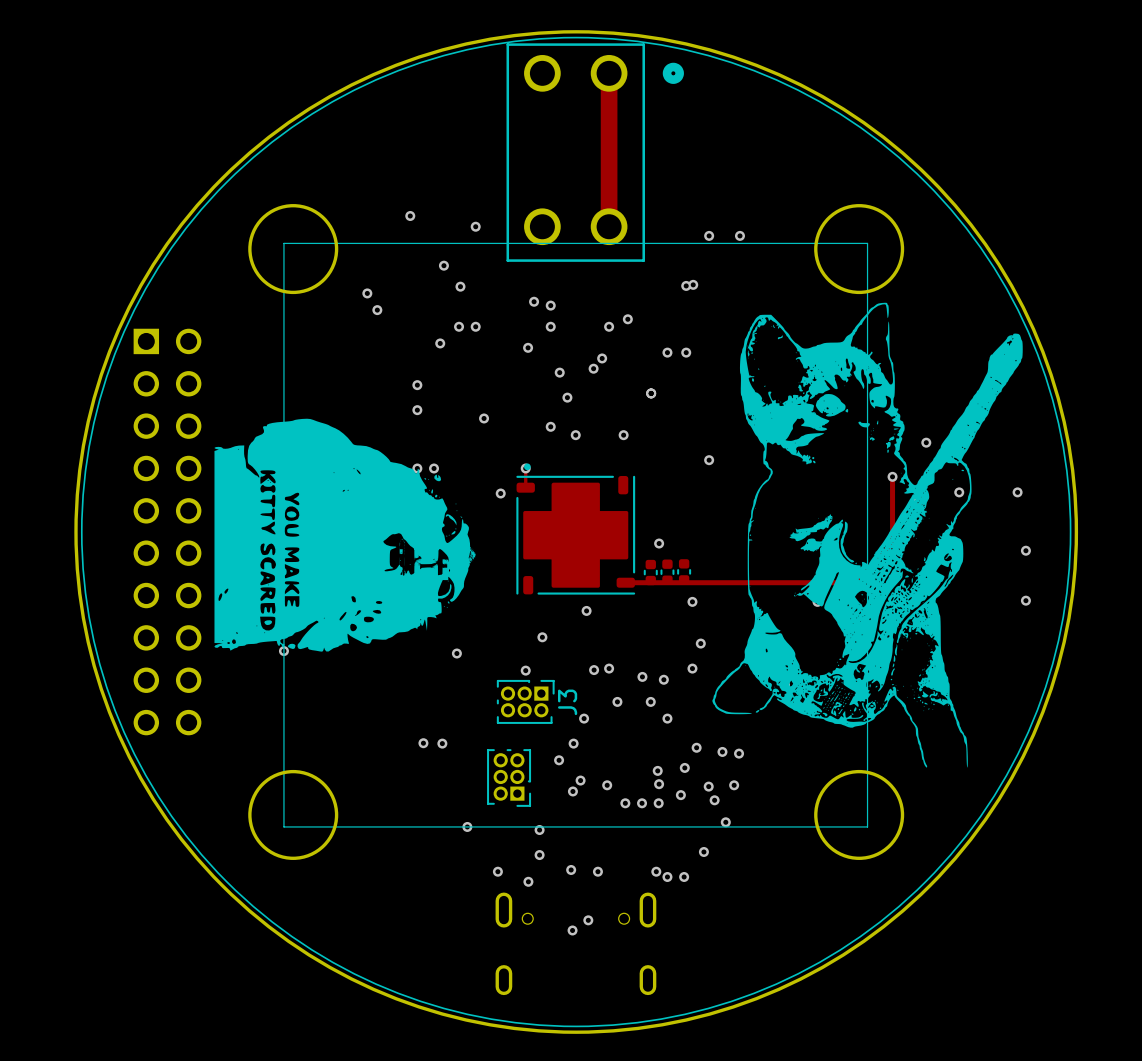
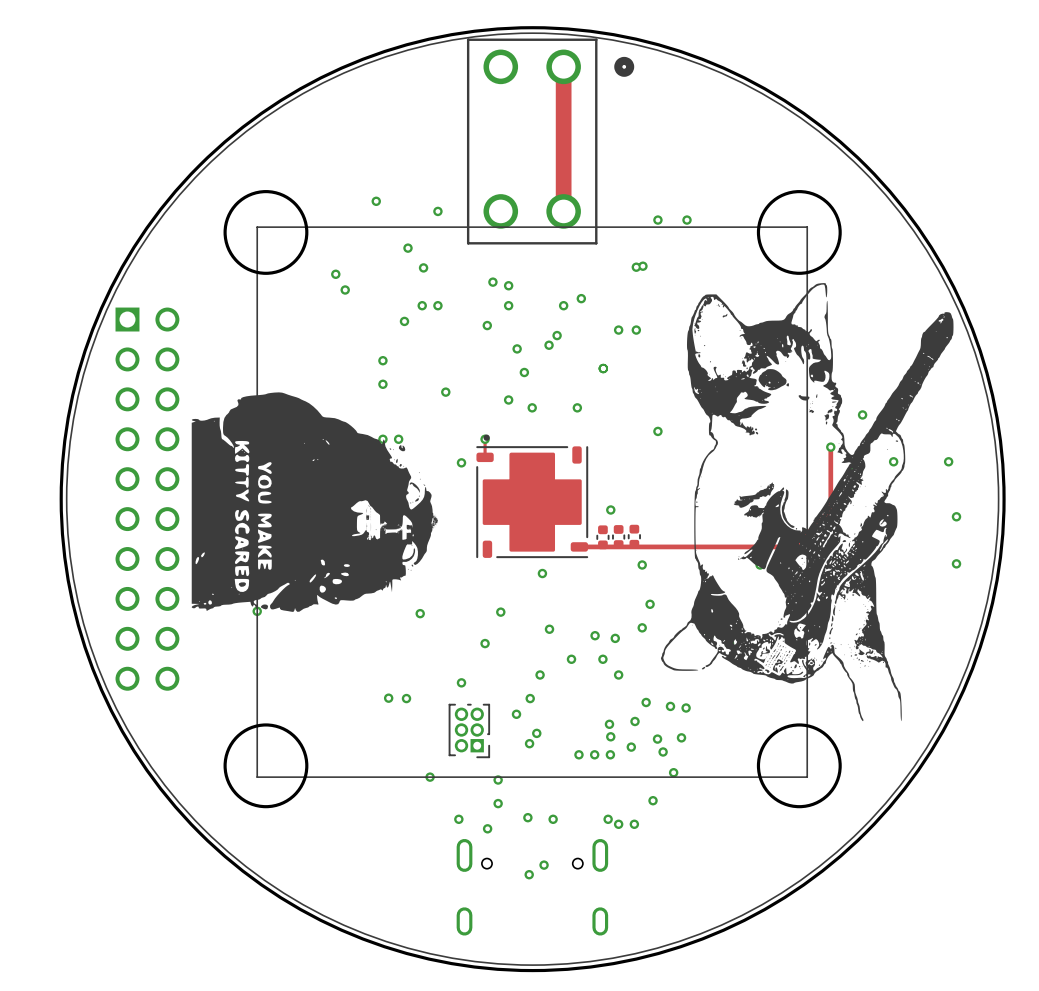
via: (542, 637) -> none
via: none -> (500, 612)
via: (609, 668) -> none
via: (525, 670) -> none
via: none -> (485, 643)
J3: (525, 701) -> none
via: none -> (461, 682)
via: (607, 785) -> none

